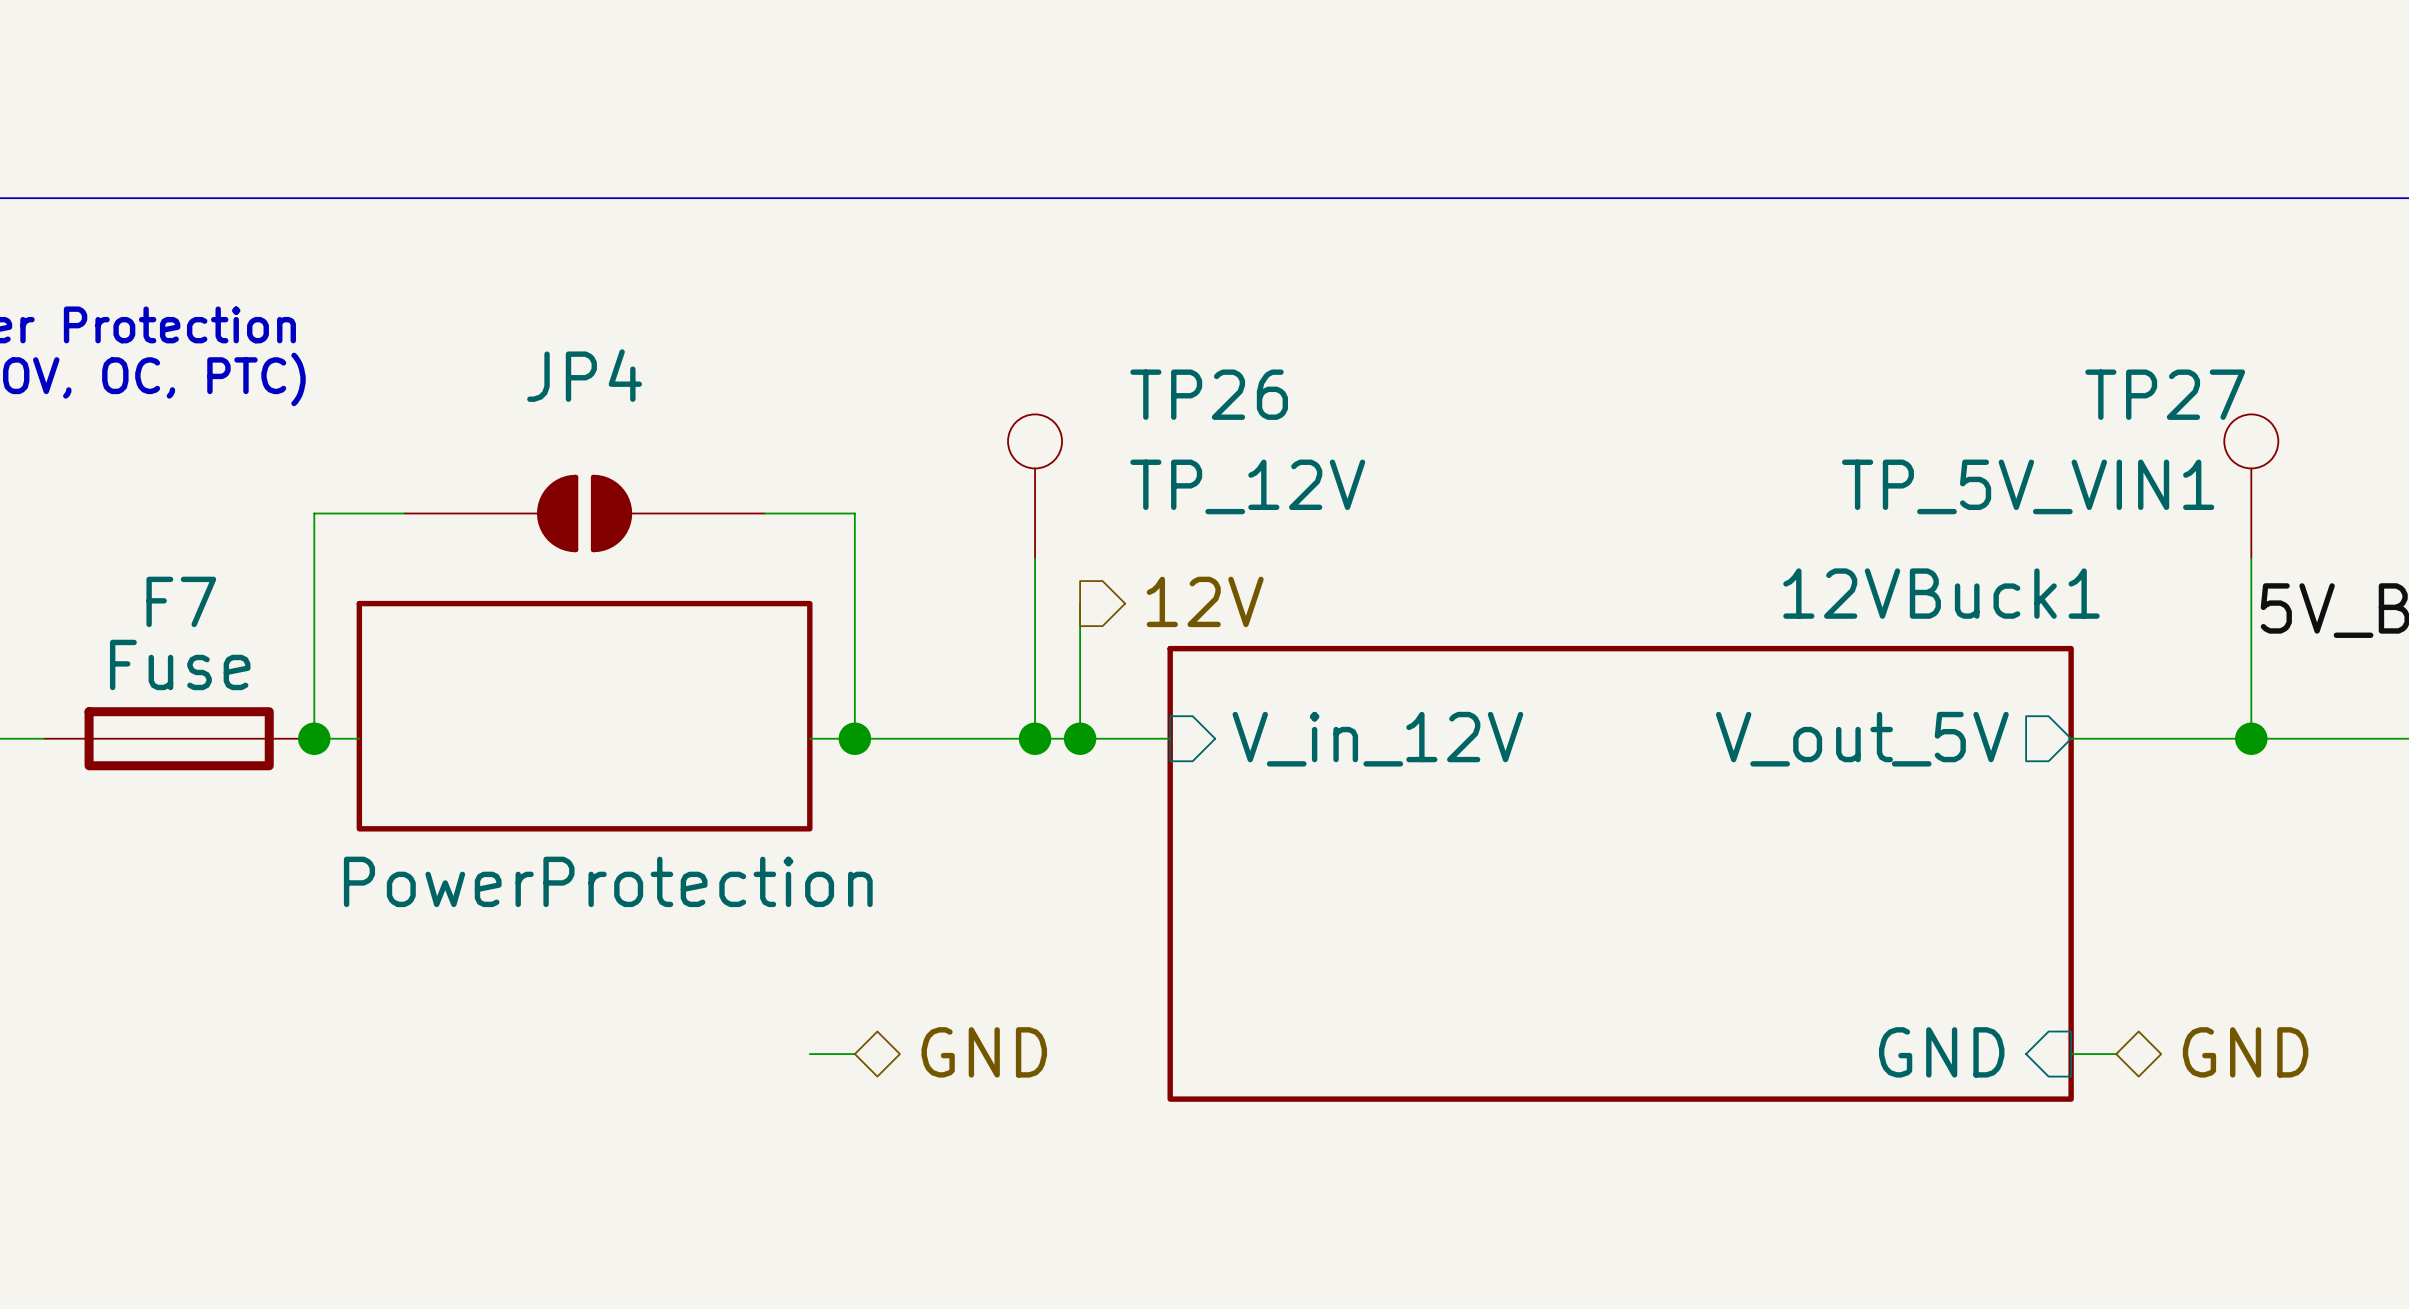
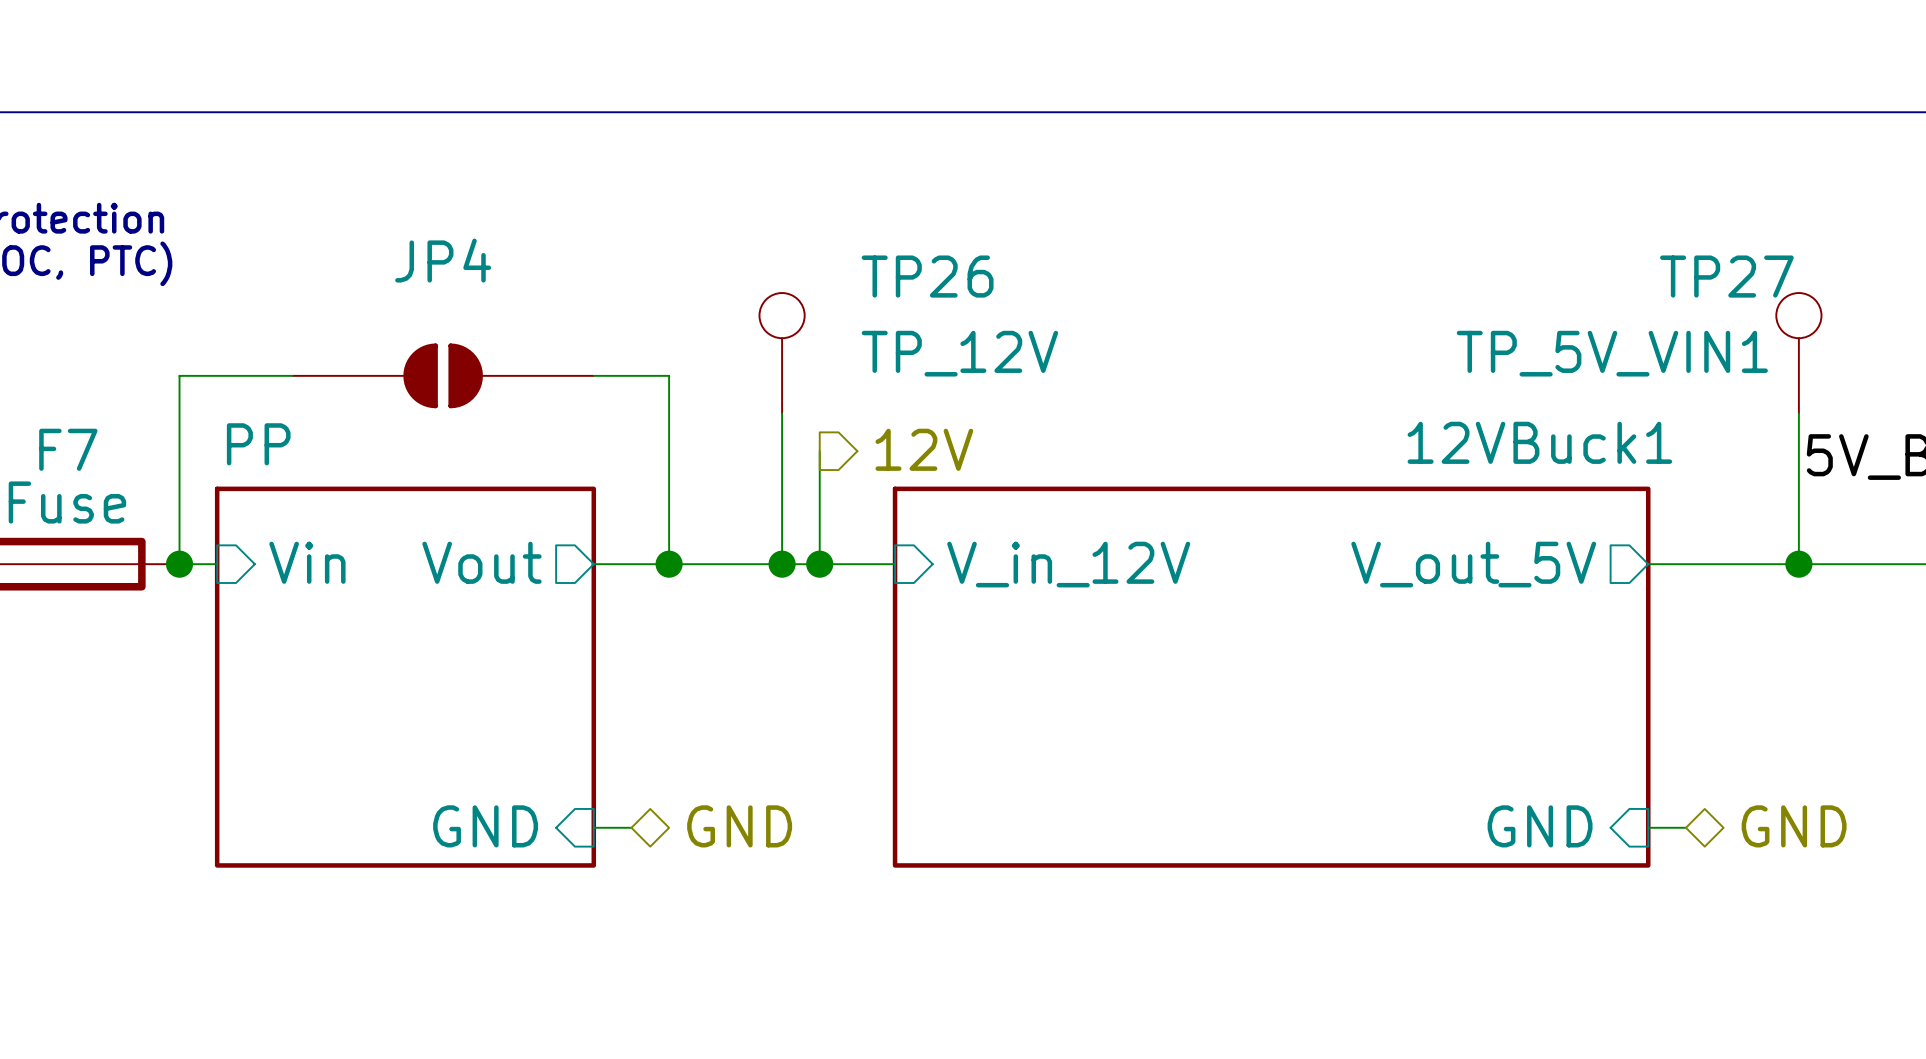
JP4 position: (584, 513) -> (443, 375)
wire: (854, 513) (854, 738) -> (631, 375) (669, 375) (669, 564)
sheet PowerProtection: (584, 716) -> none
sheet pin: none -> Vin (307, 562)
sheet pin: none -> Vout (482, 562)
junction position: (854, 738) -> (669, 564)
sheet PP: none -> (405, 677)
sheet pin: none -> GND (485, 826)

